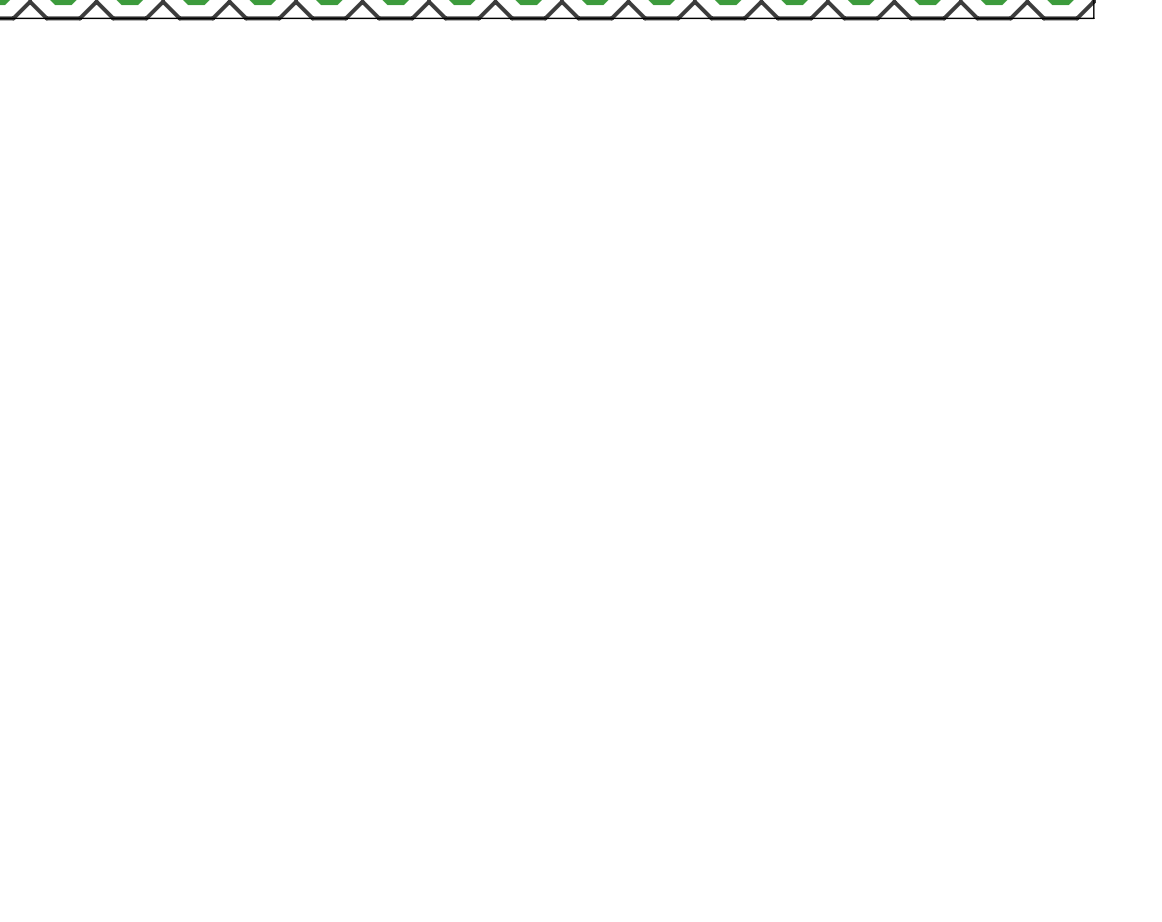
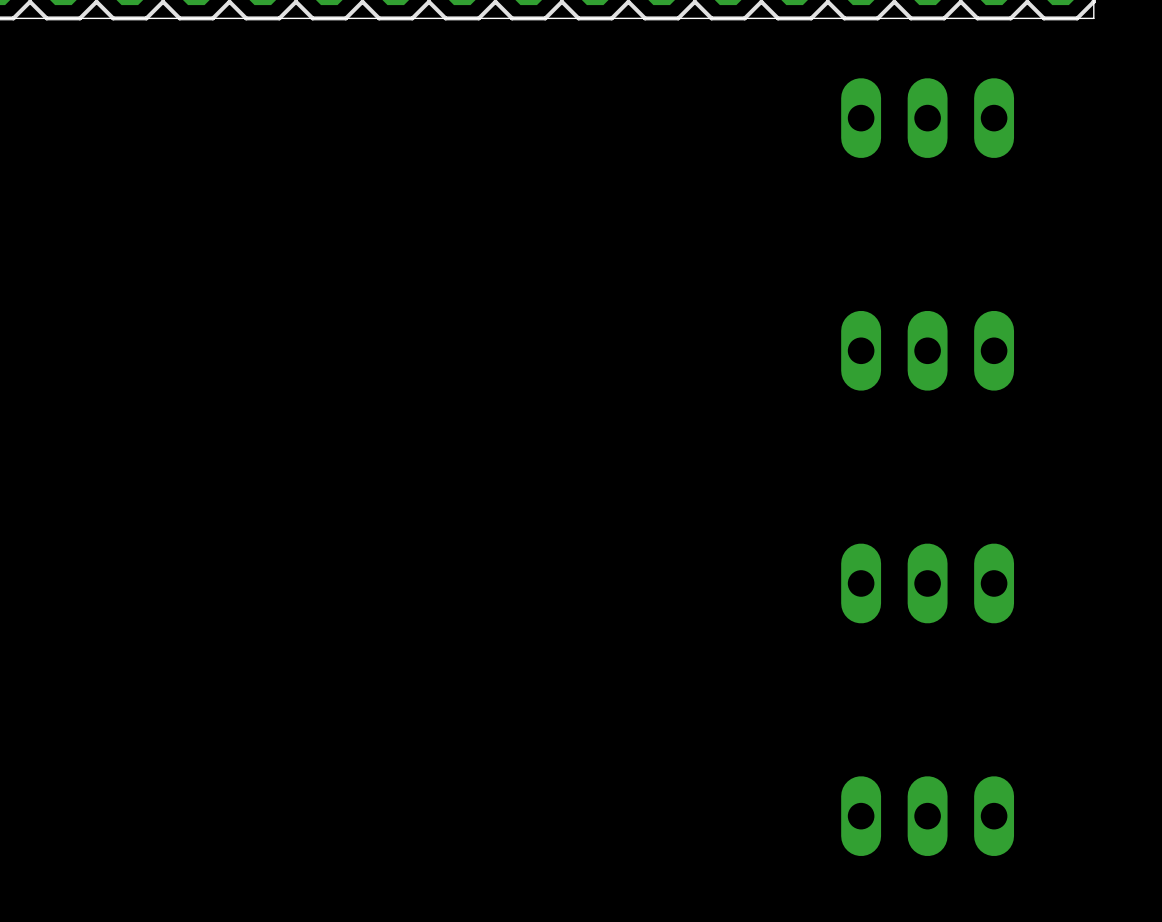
part: none -> (927, 118)
part: none -> (927, 350)
part: none -> (927, 583)
part: none -> (927, 816)

